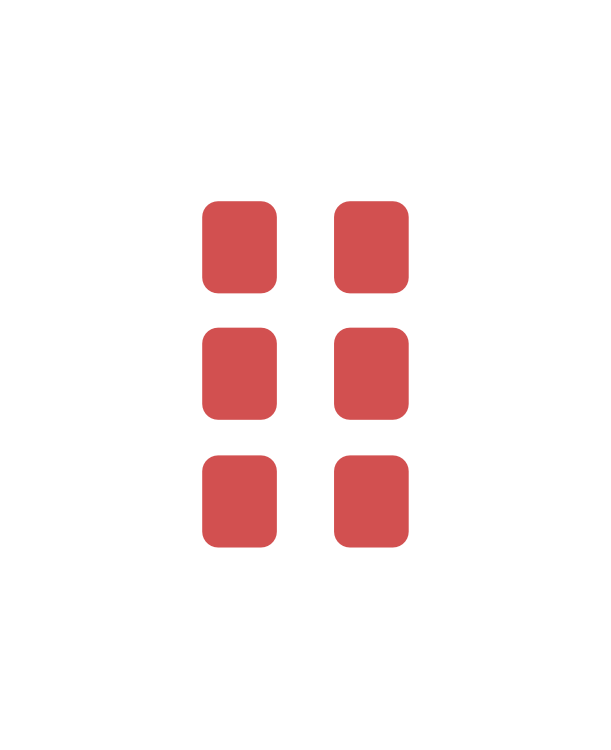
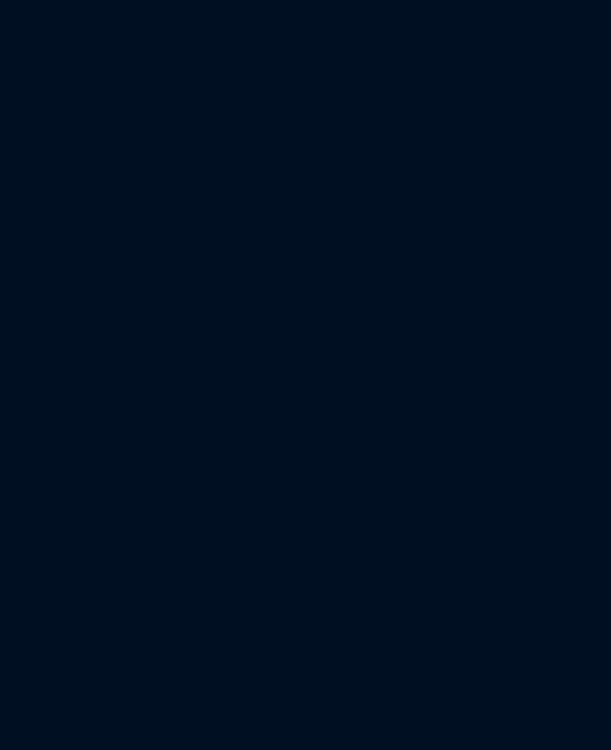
part: (305, 247) -> none
part: (305, 373) -> none
part: (305, 501) -> none

